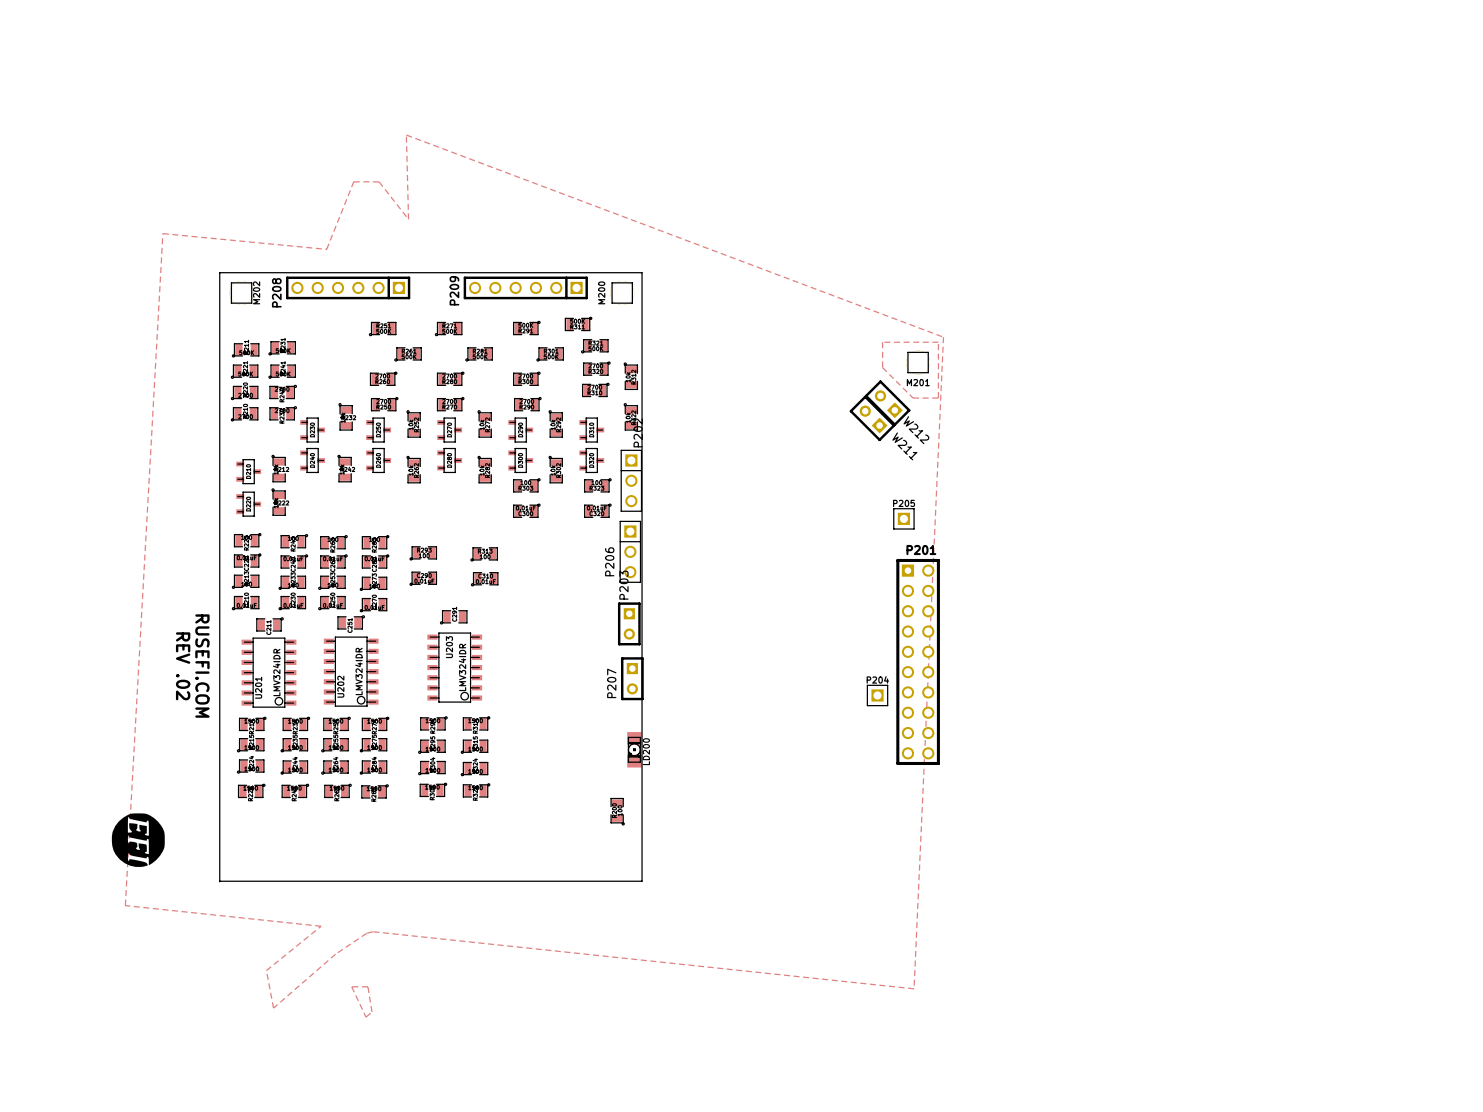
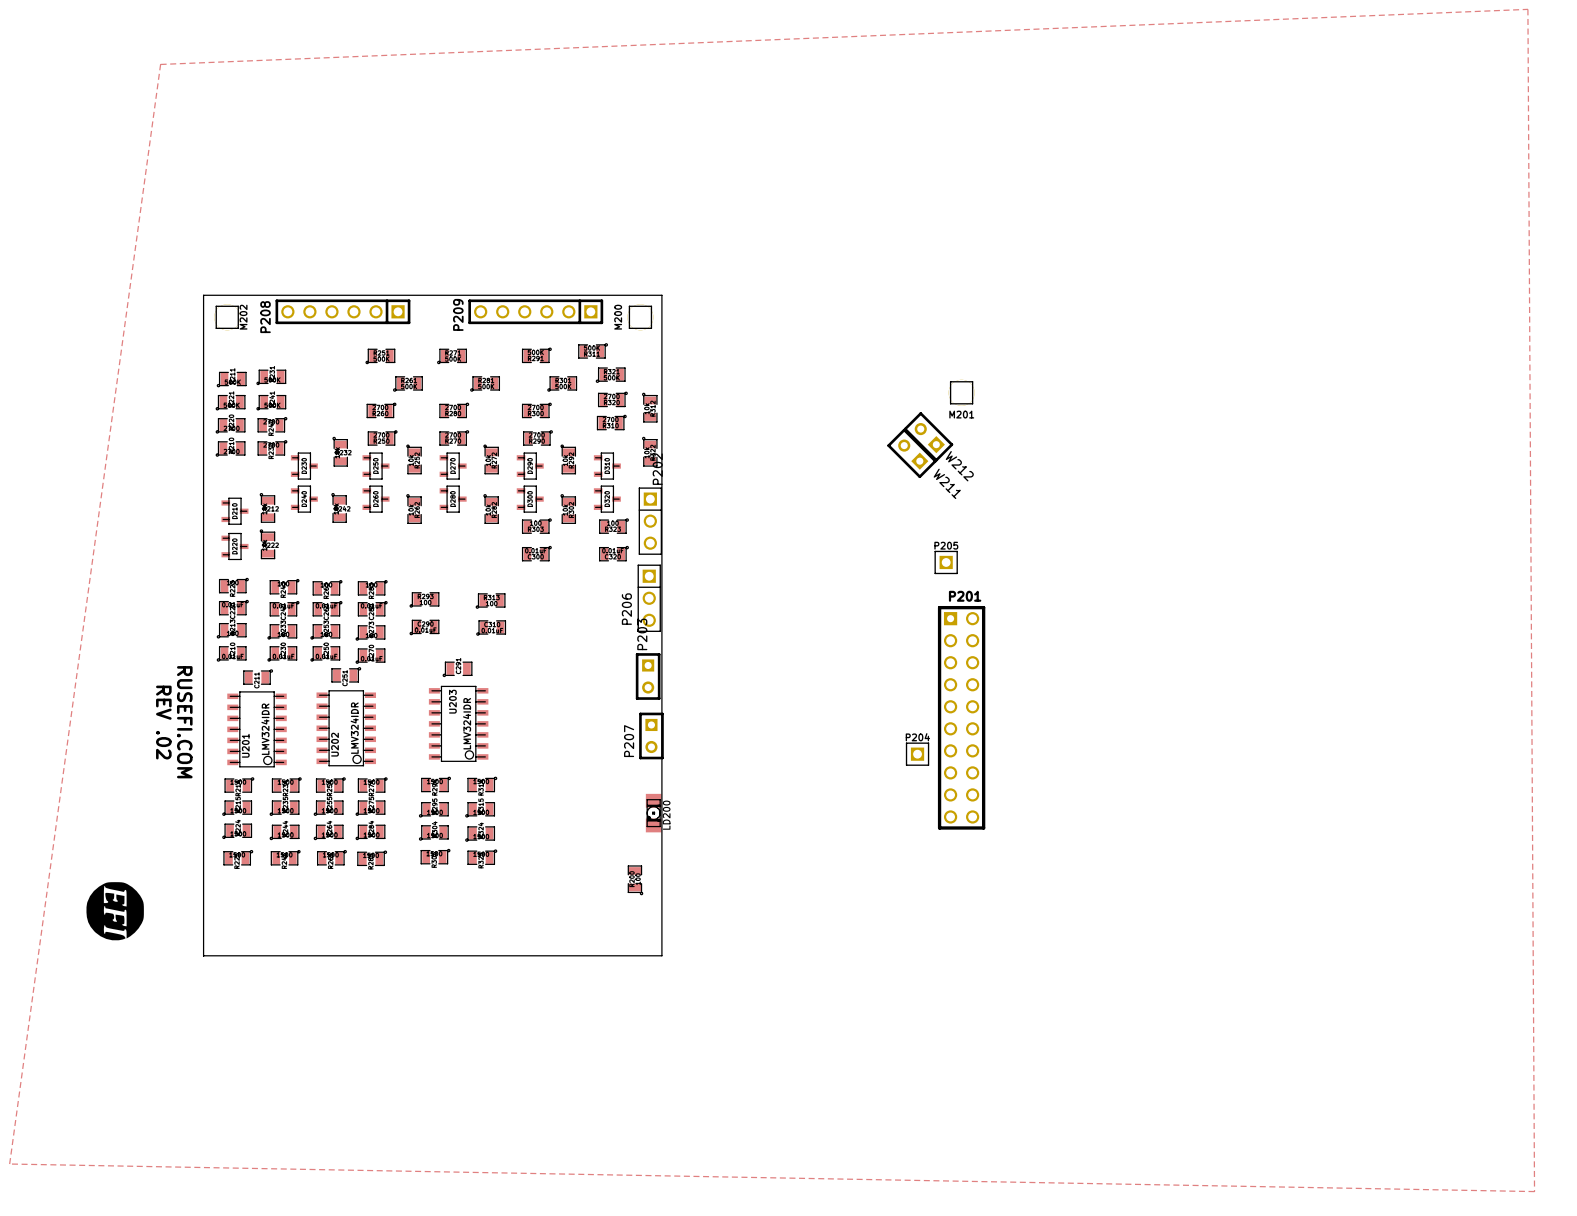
zone outline: none -> (1527, 9) (1534, 1191) (9, 1164) (160, 64) (1527, 9)
zone outline: (406, 135) (408, 219) (379, 181) (353, 181) (326, 249) (162, 233) (125, 905) (321, 926) (266, 970) (273, 1008) (335, 954) (366, 933) (372, 931) (914, 988) (943, 337) (406, 135) -> none
zone outline: (882, 342) (938, 342) (938, 398) (913, 398) (882, 367) (882, 342) -> none
zone outline: (351, 986) (367, 986) (371, 1011) (366, 1017) (351, 986) -> none

